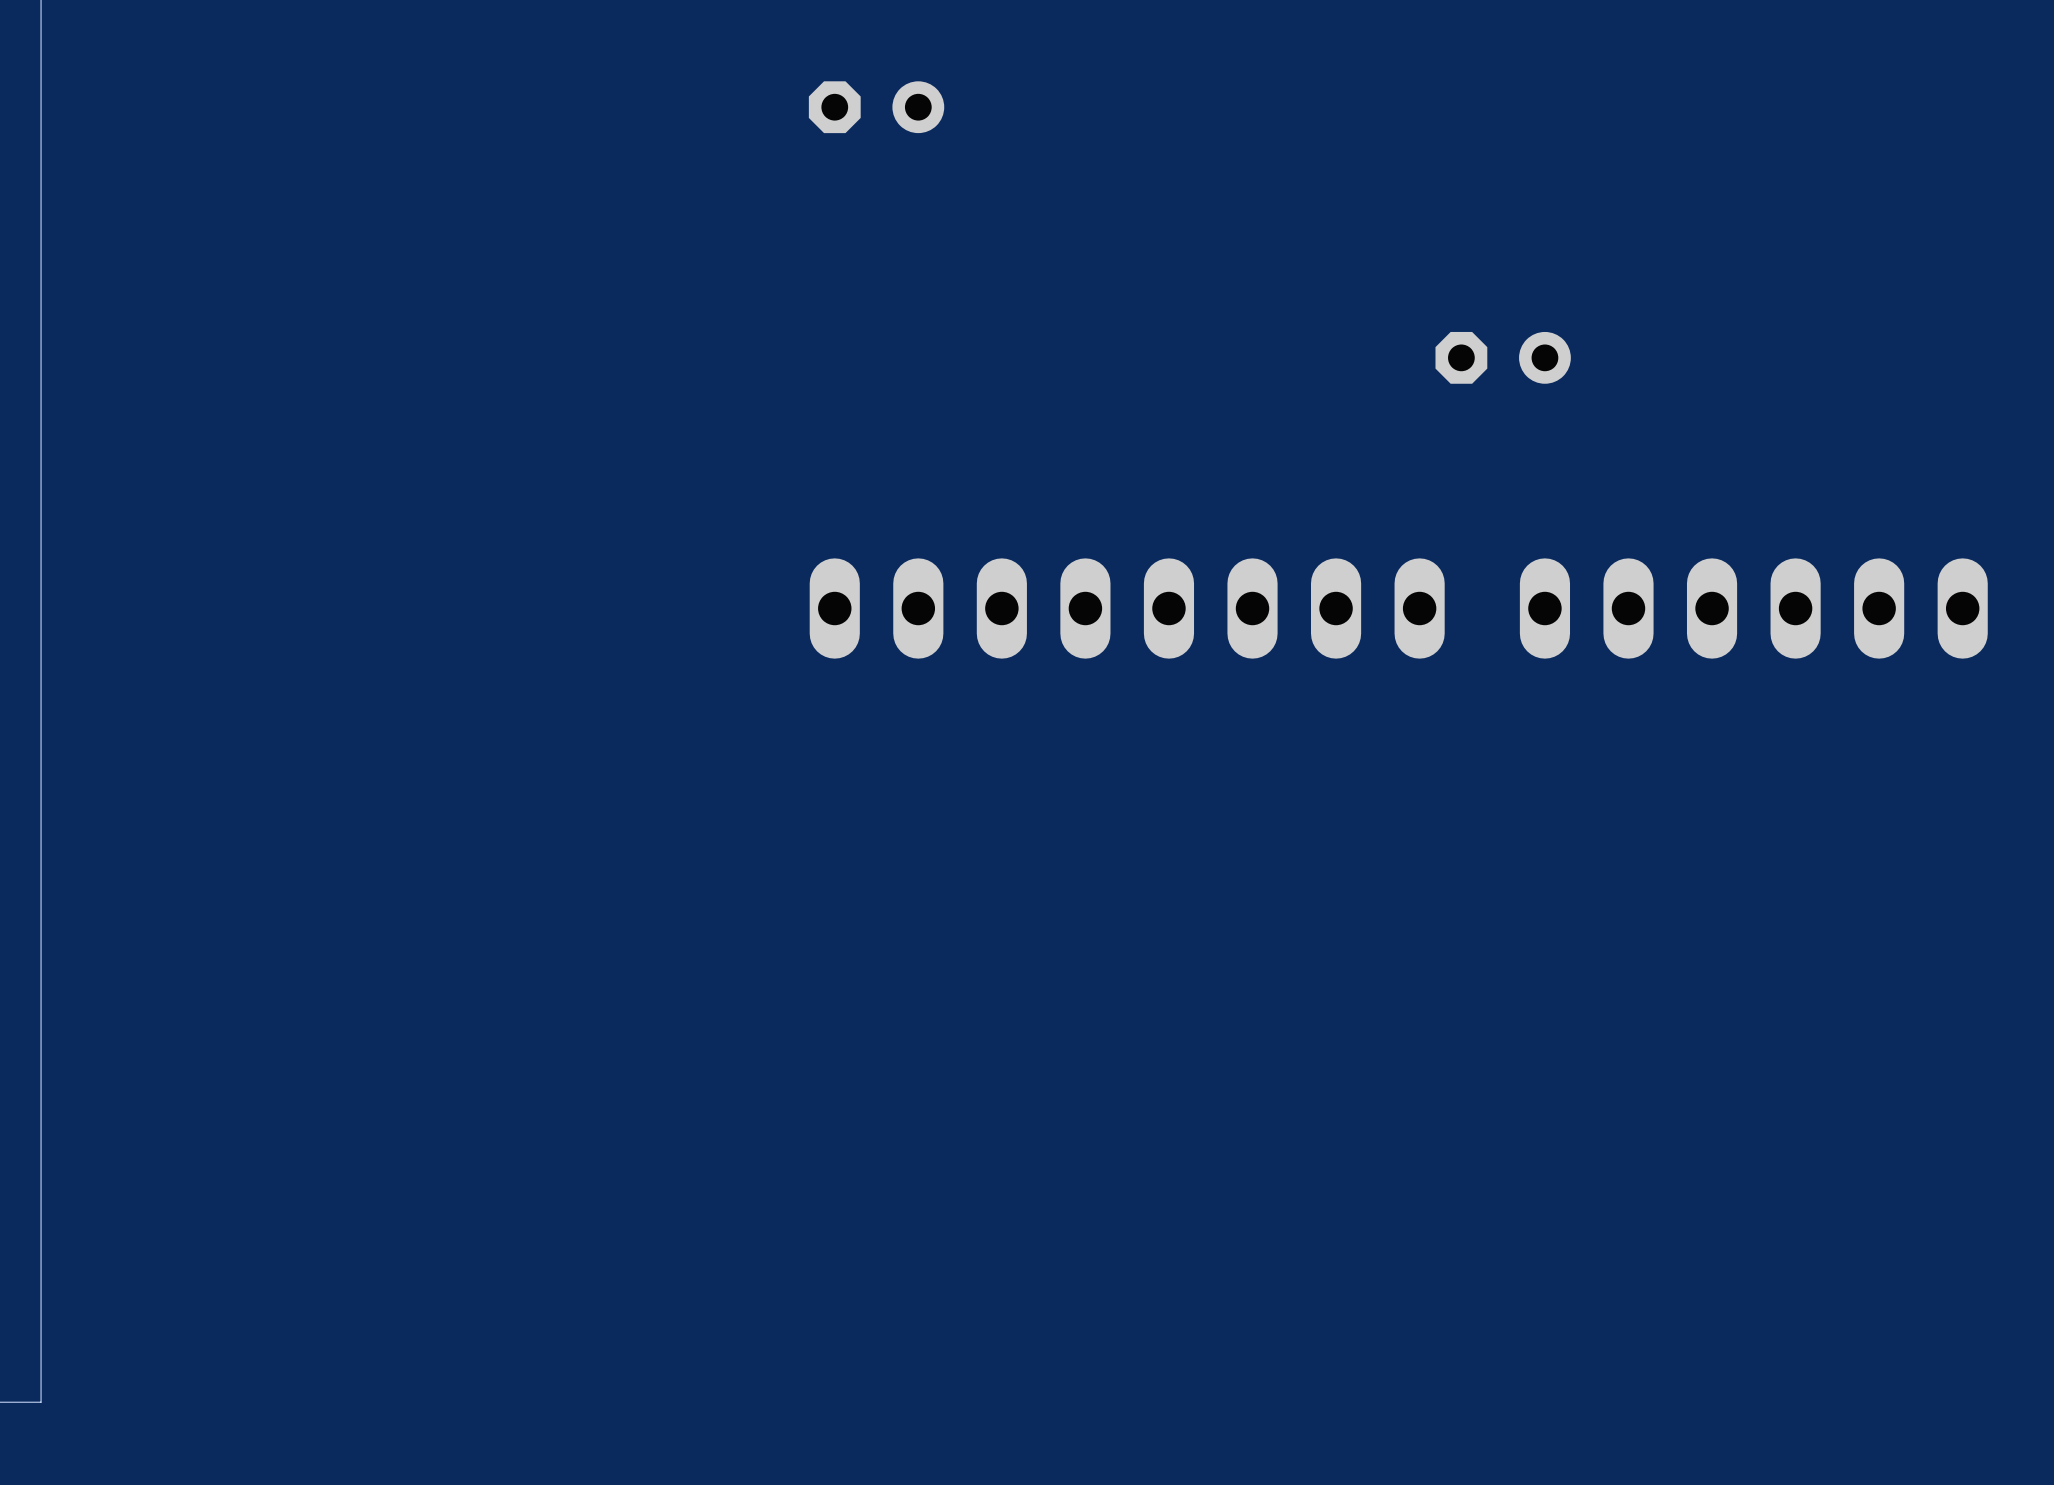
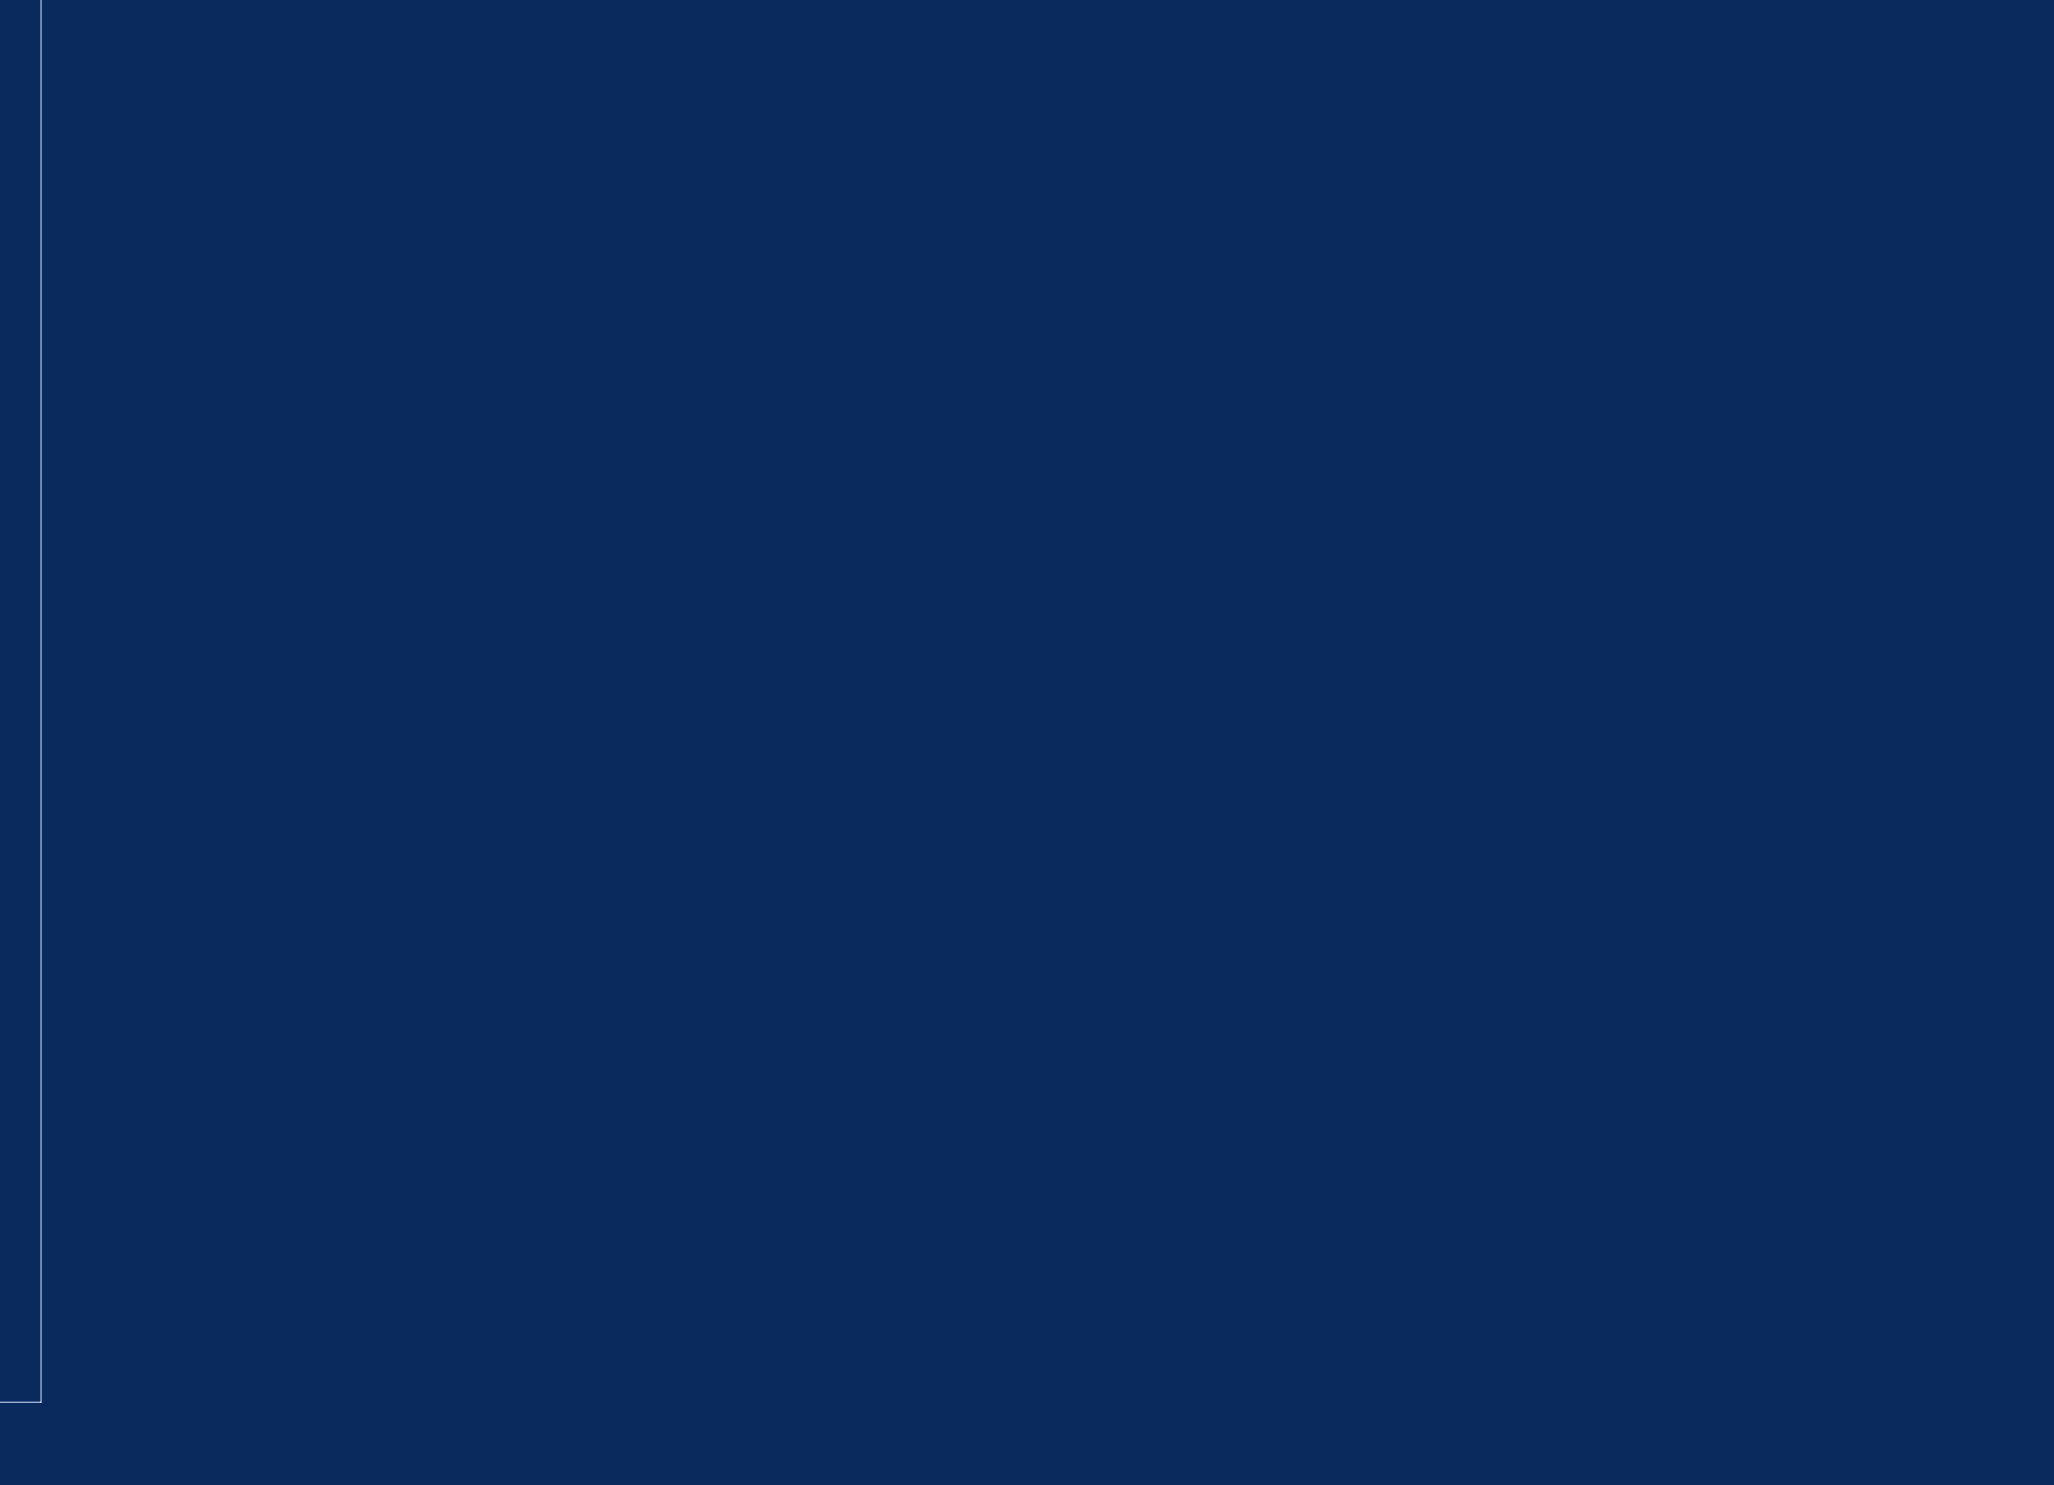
part: (876, 107) -> none
part: (1503, 357) -> none
part: (1127, 608) -> none
part: (1753, 608) -> none

